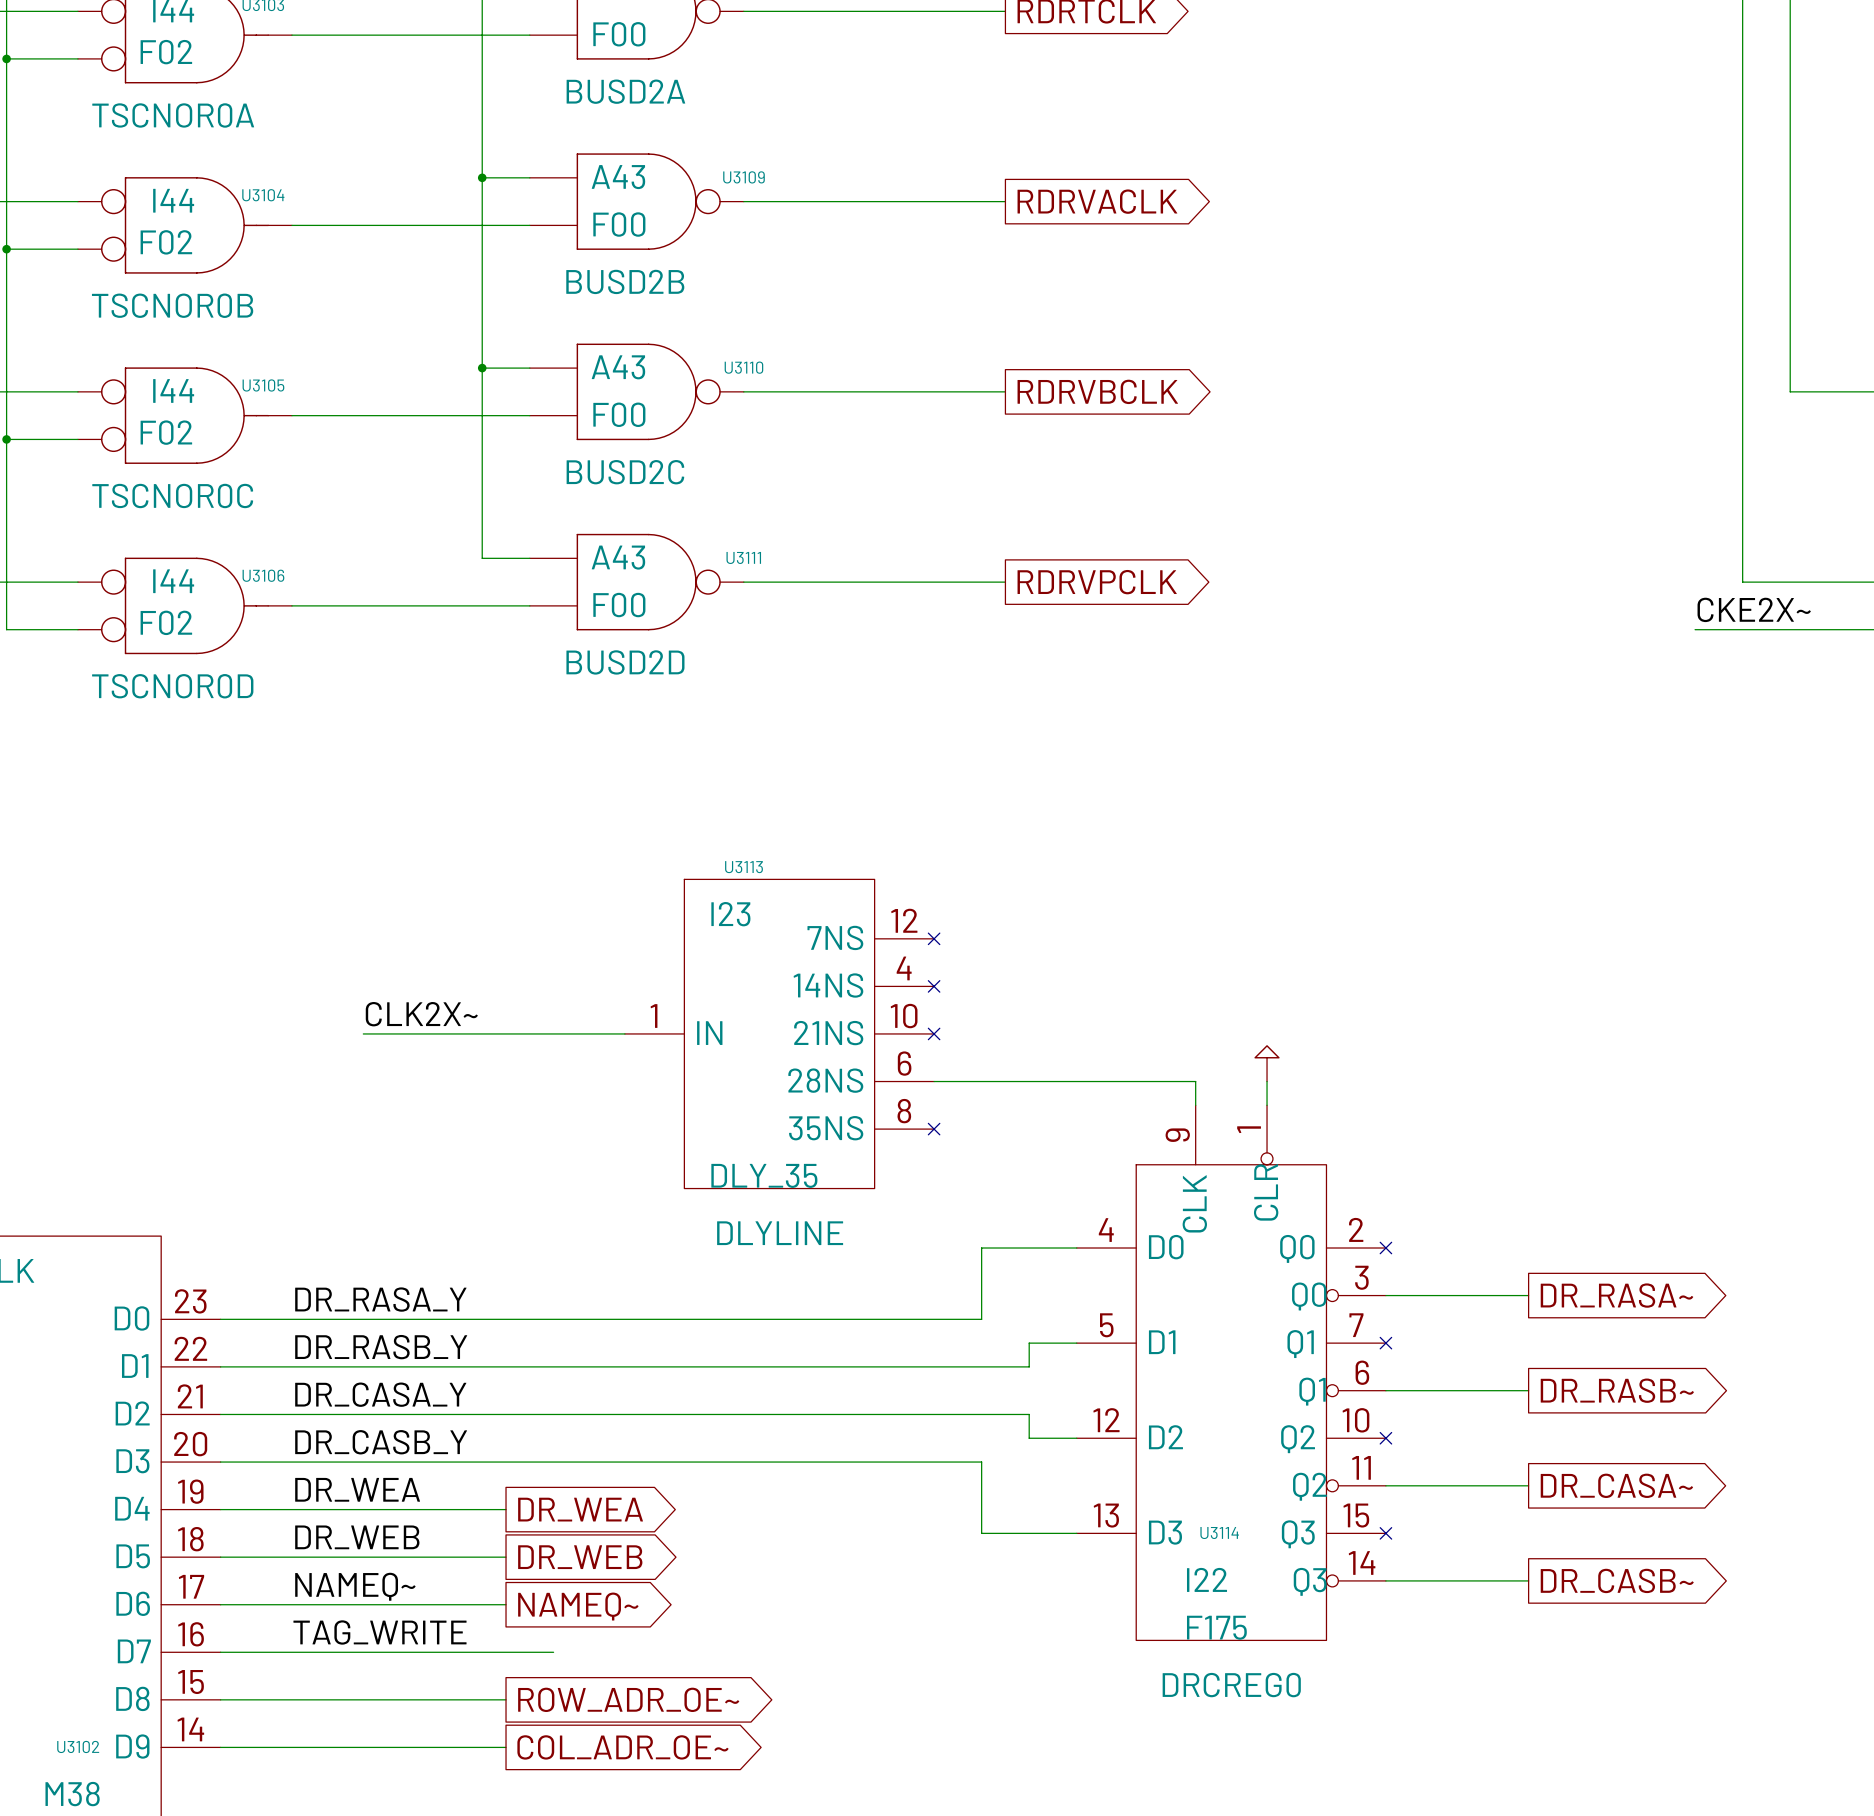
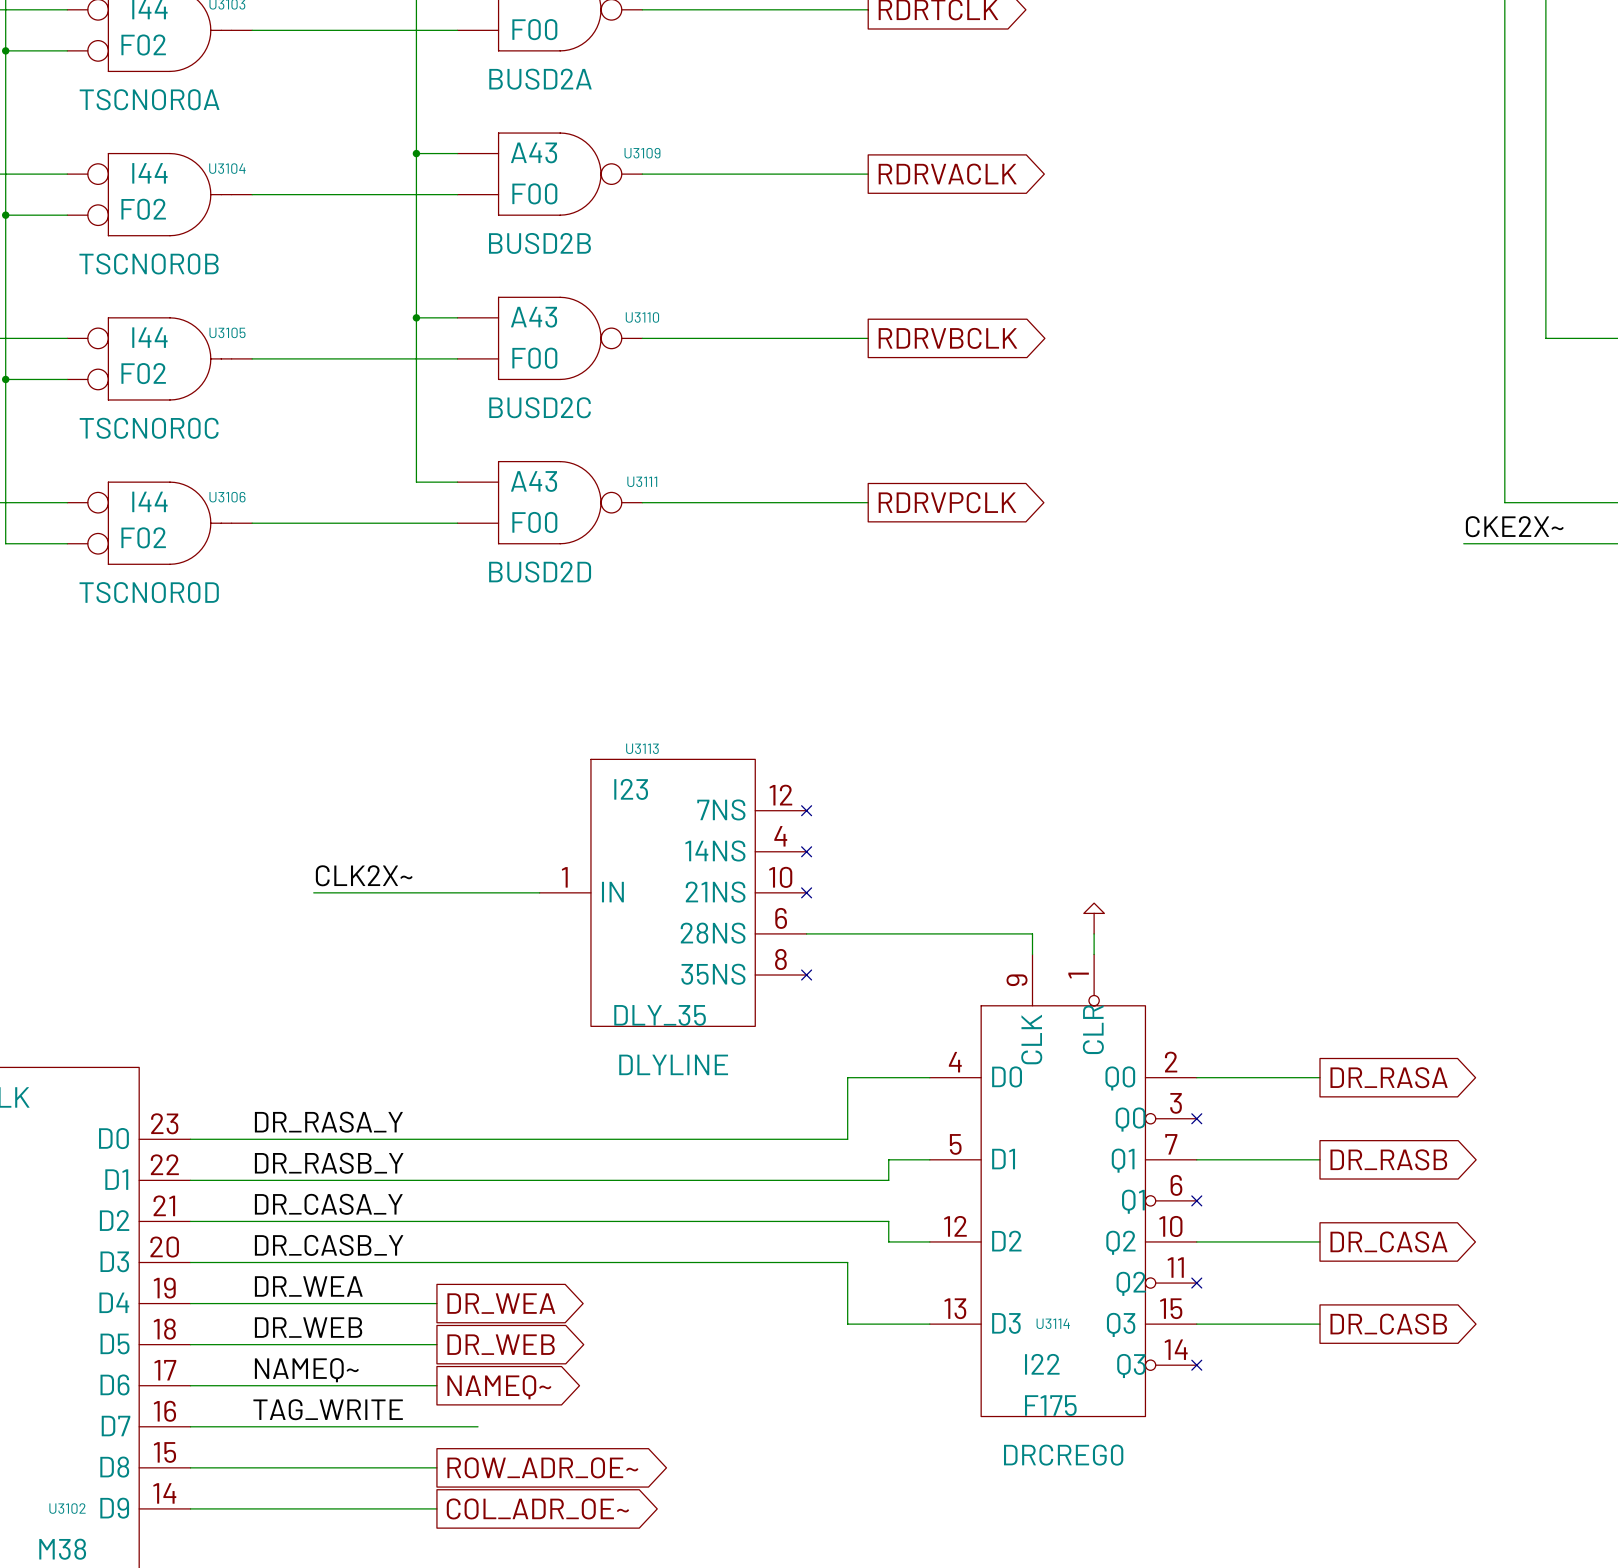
no-connect mark: (1385, 1248) -> none
global label: none -> DR_RASA (1389, 1077)
wire: (1385, 1295) (1528, 1295) -> (1196, 1077) (1320, 1077)
no-connect mark: none -> (1196, 1118)
global label: DR_RASA~ (1617, 1295) -> none
no-connect mark: (1385, 1343) -> none
global label: none -> DR_RASB (1388, 1159)
wire: (1385, 1390) (1528, 1390) -> (1196, 1159) (1320, 1159)
no-connect mark: none -> (1196, 1200)
global label: DR_RASB~ (1617, 1390) -> none
no-connect mark: (1385, 1438) -> none
global label: none -> DR_CASA (1388, 1241)
wire: (1385, 1485) (1528, 1485) -> (1196, 1241) (1320, 1241)
no-connect mark: none -> (1196, 1283)
global label: DR_CASA~ (1616, 1485) -> none
no-connect mark: (1385, 1533) -> none
global label: none -> DR_CASB (1388, 1324)
wire: (1385, 1580) (1528, 1580) -> (1196, 1324) (1320, 1324)
no-connect mark: none -> (1196, 1365)
global label: DR_CASB~ (1617, 1580) -> none

